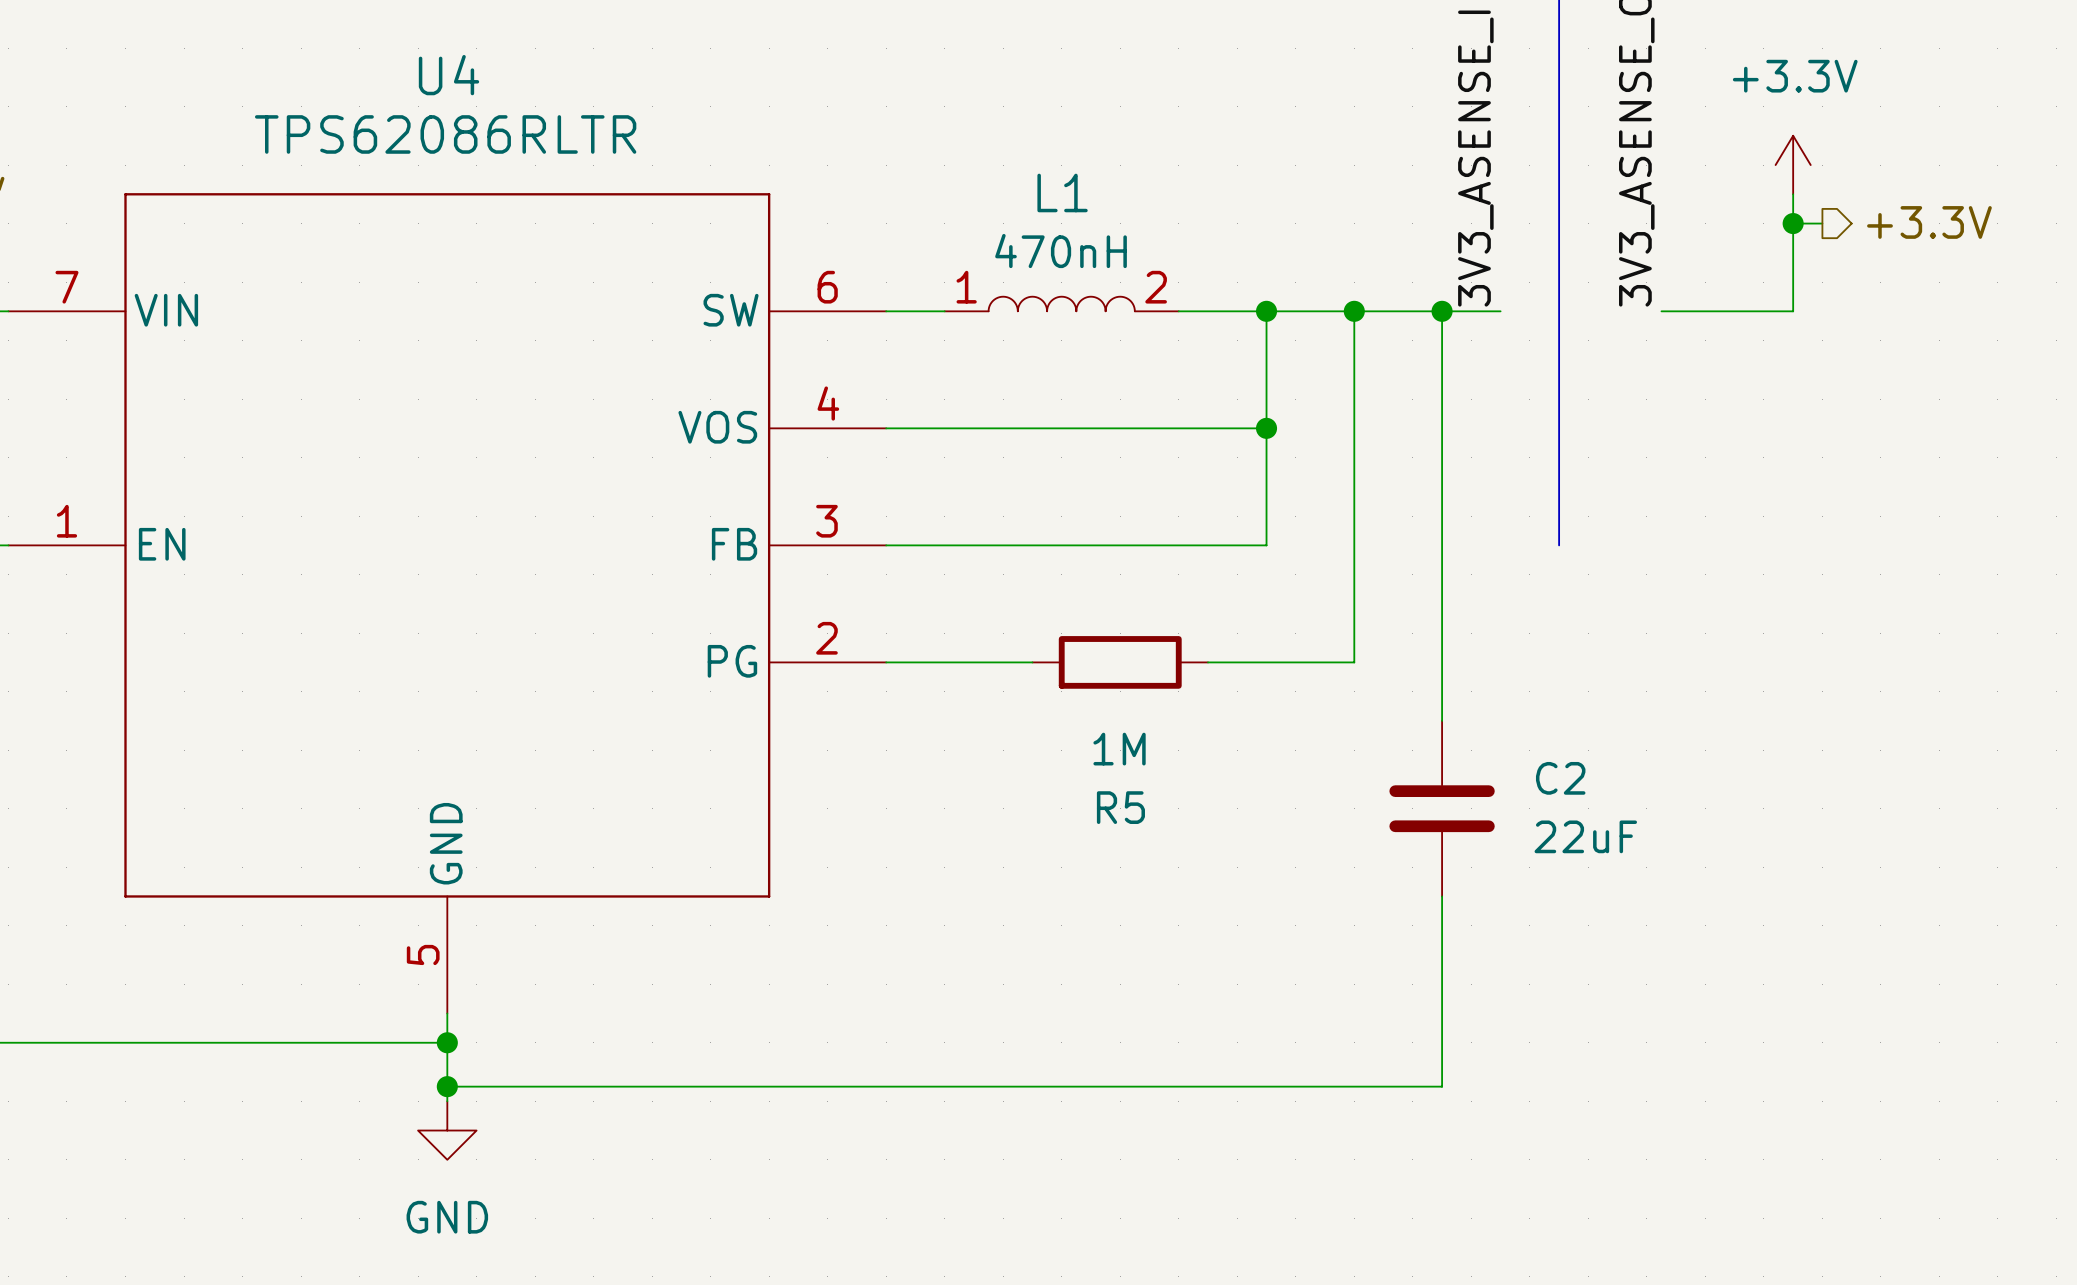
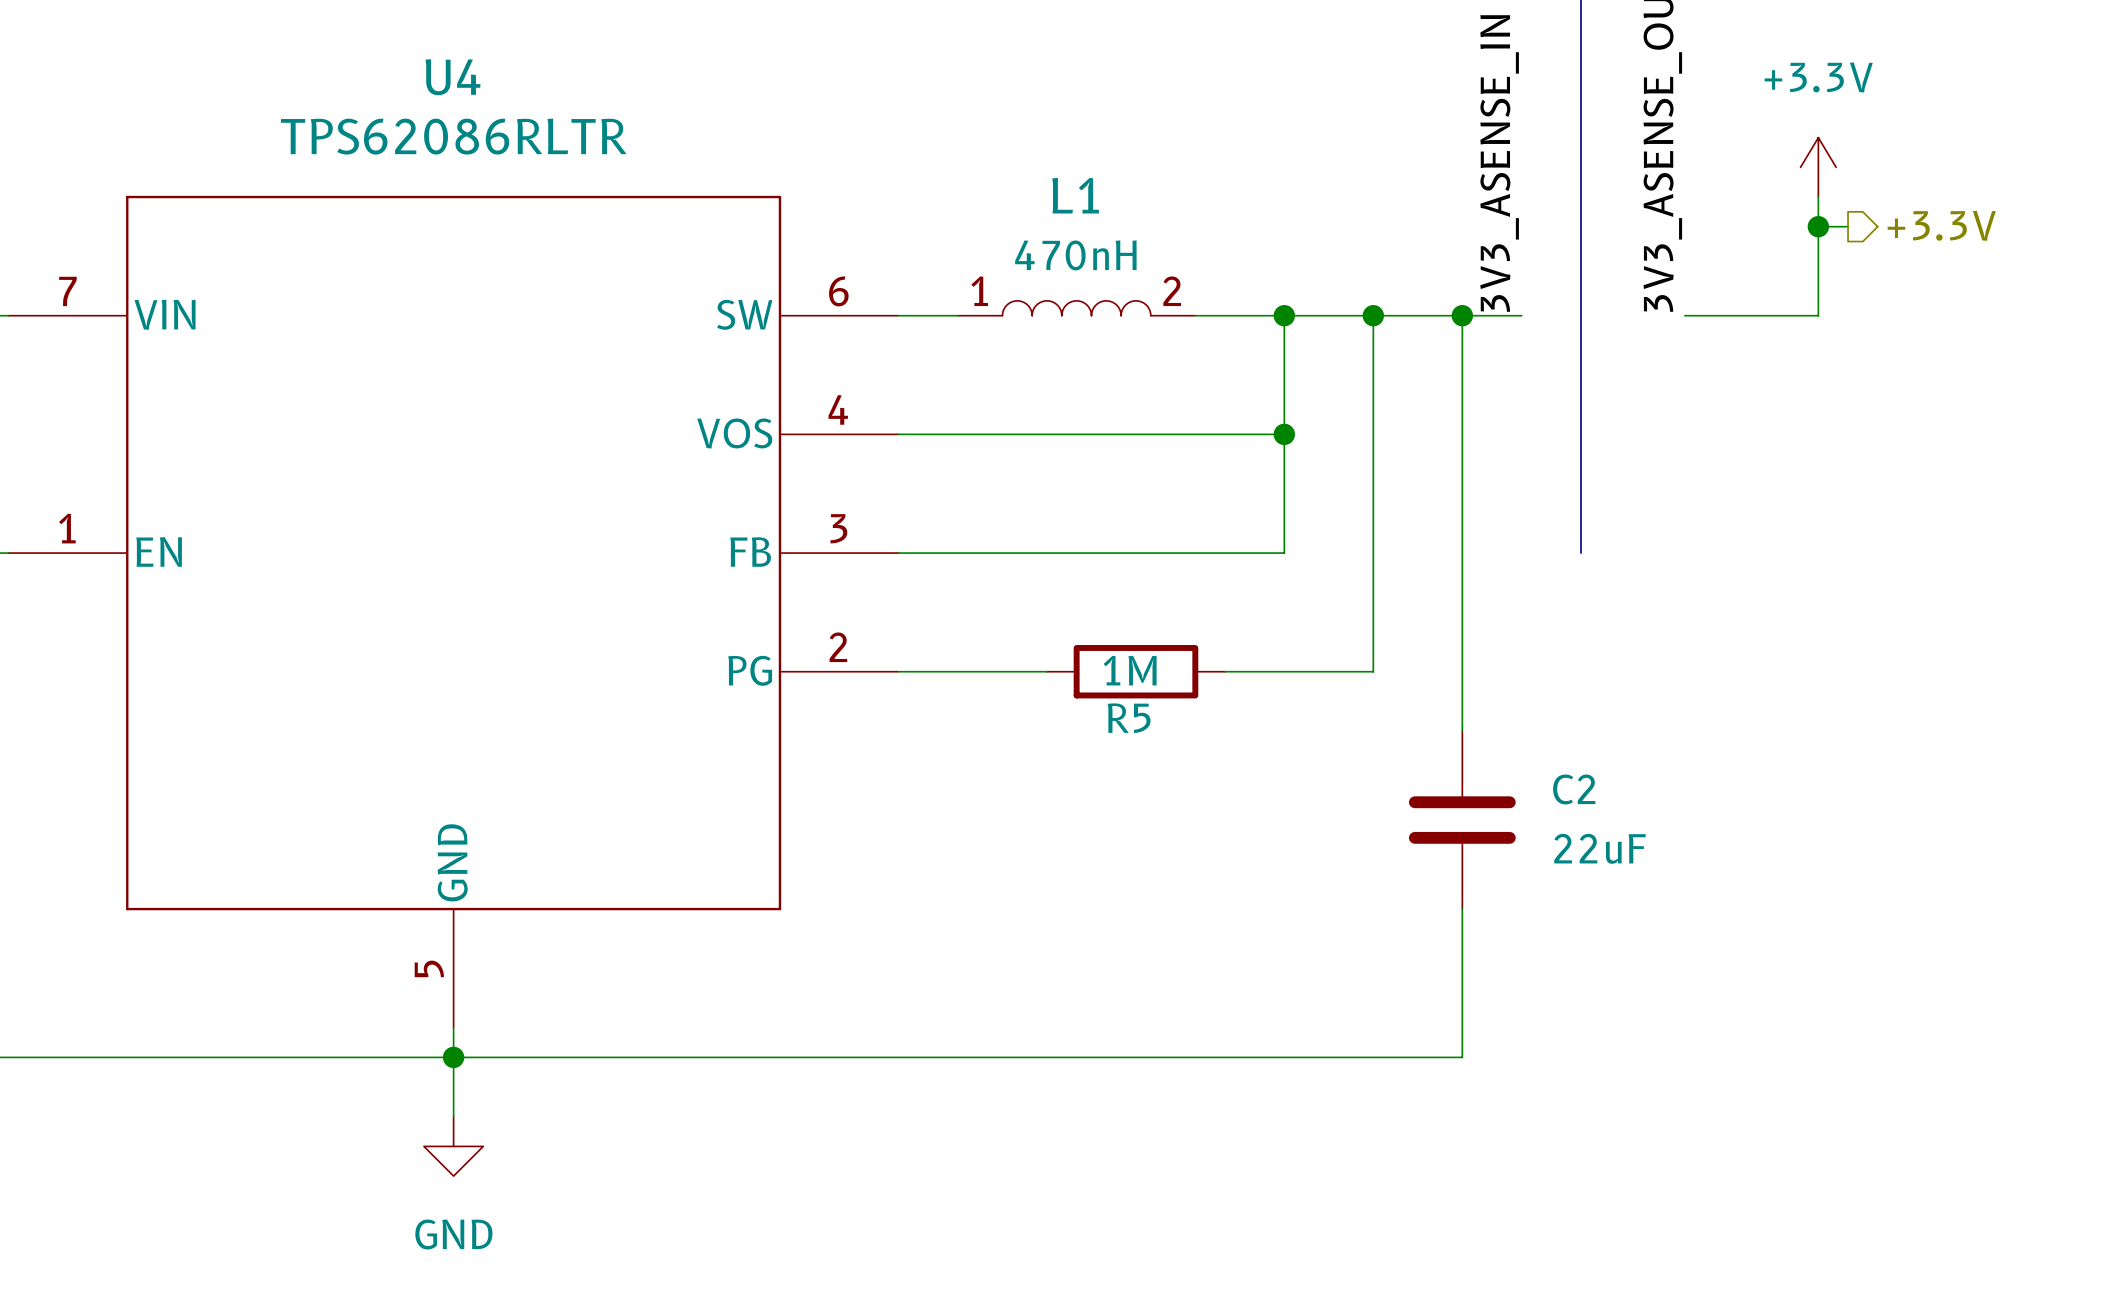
R5 value position: 1M (1119, 749) -> 1M (1130, 670)
R5 name position: R5 (1120, 807) -> R5 (1129, 718)
wire: (1442, 1042) (1442, 1086) (447, 1086) -> (1462, 1057) (453, 1057)
junction: (447, 1086) -> none

